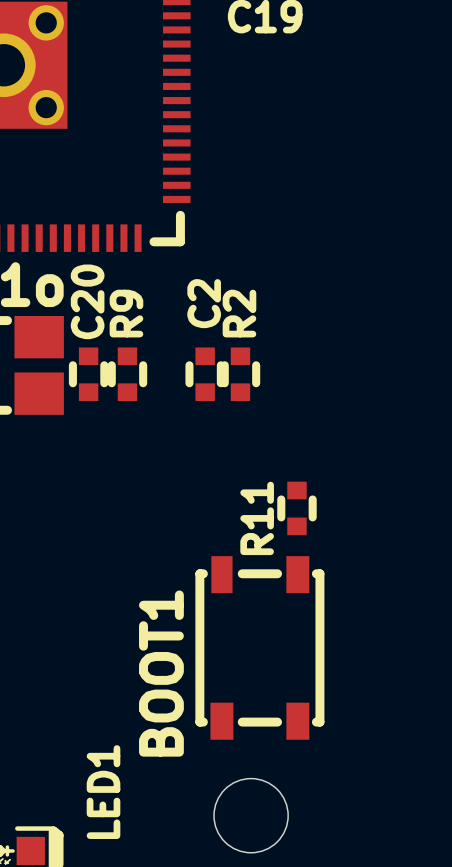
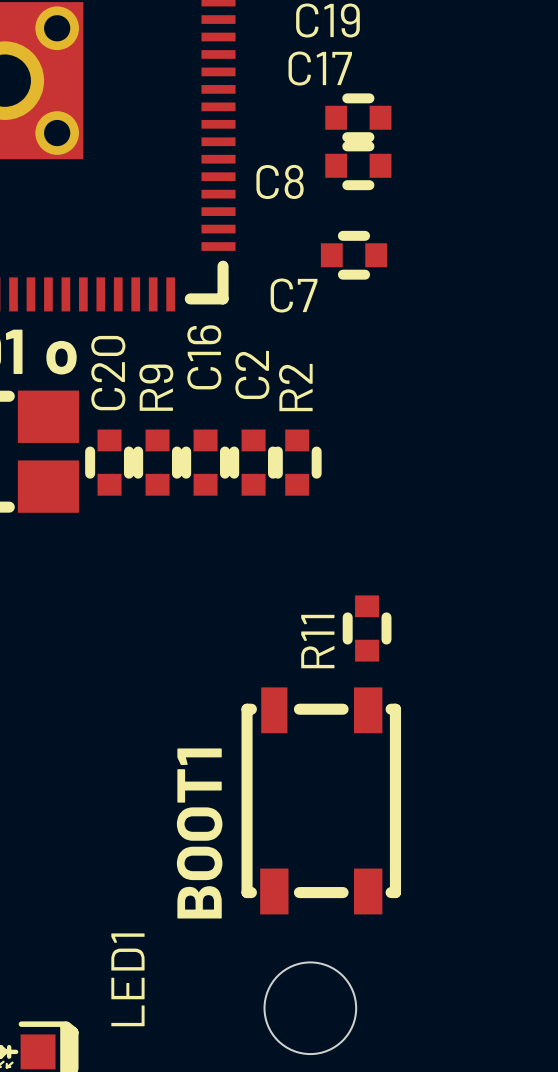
C17: none -> (358, 117)
C8: none -> (358, 165)
C7: none -> (353, 255)
C16: none -> (205, 462)

